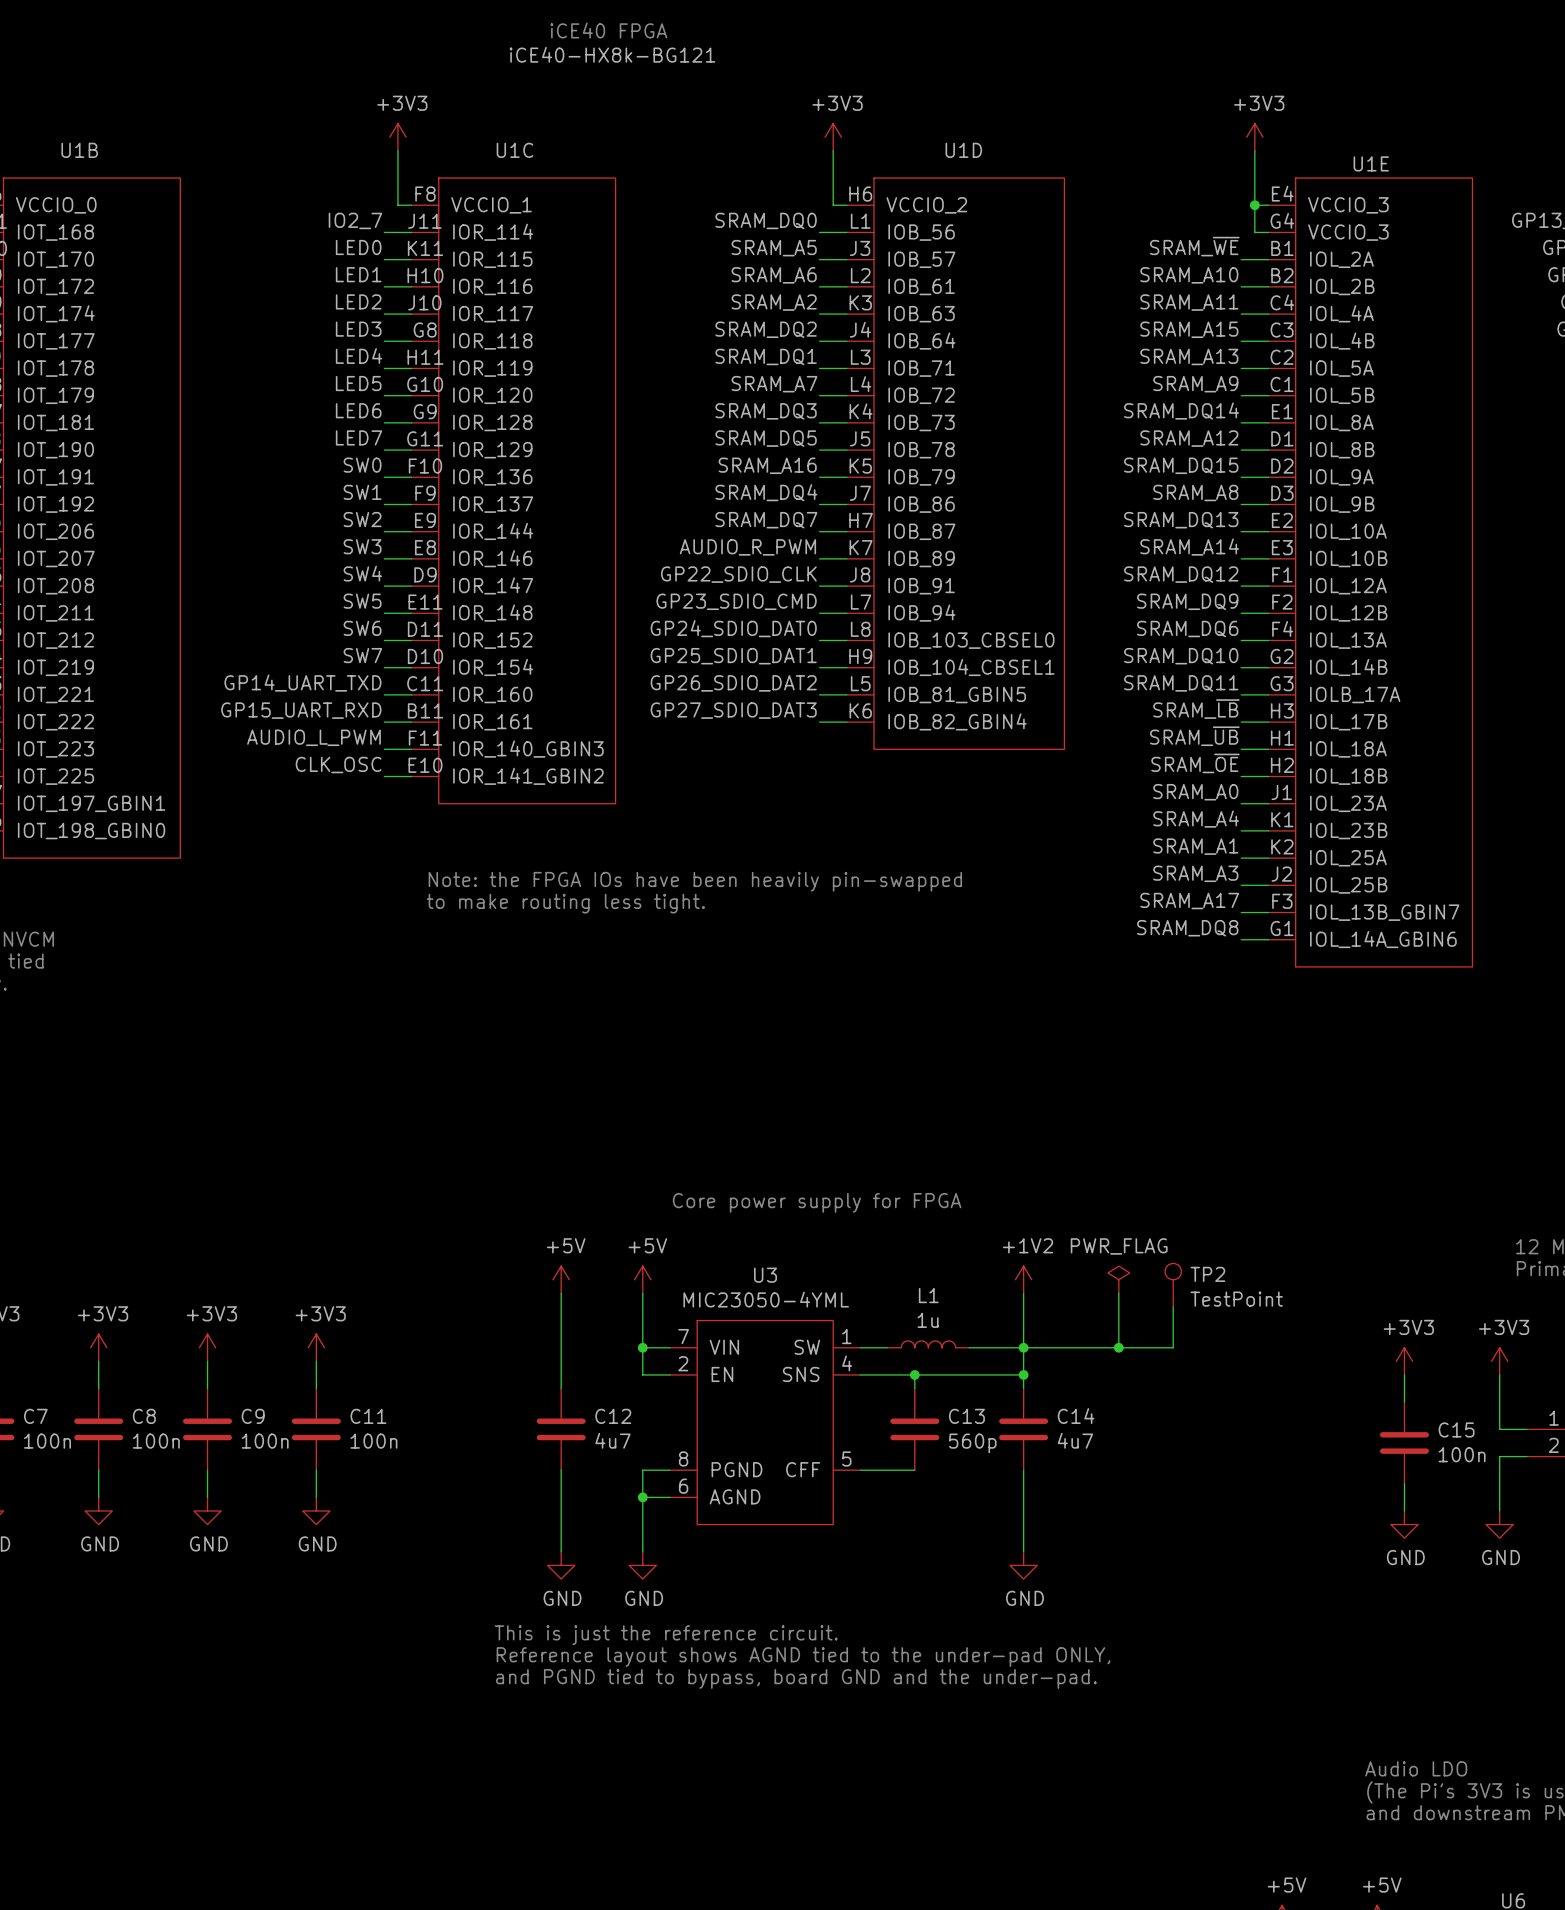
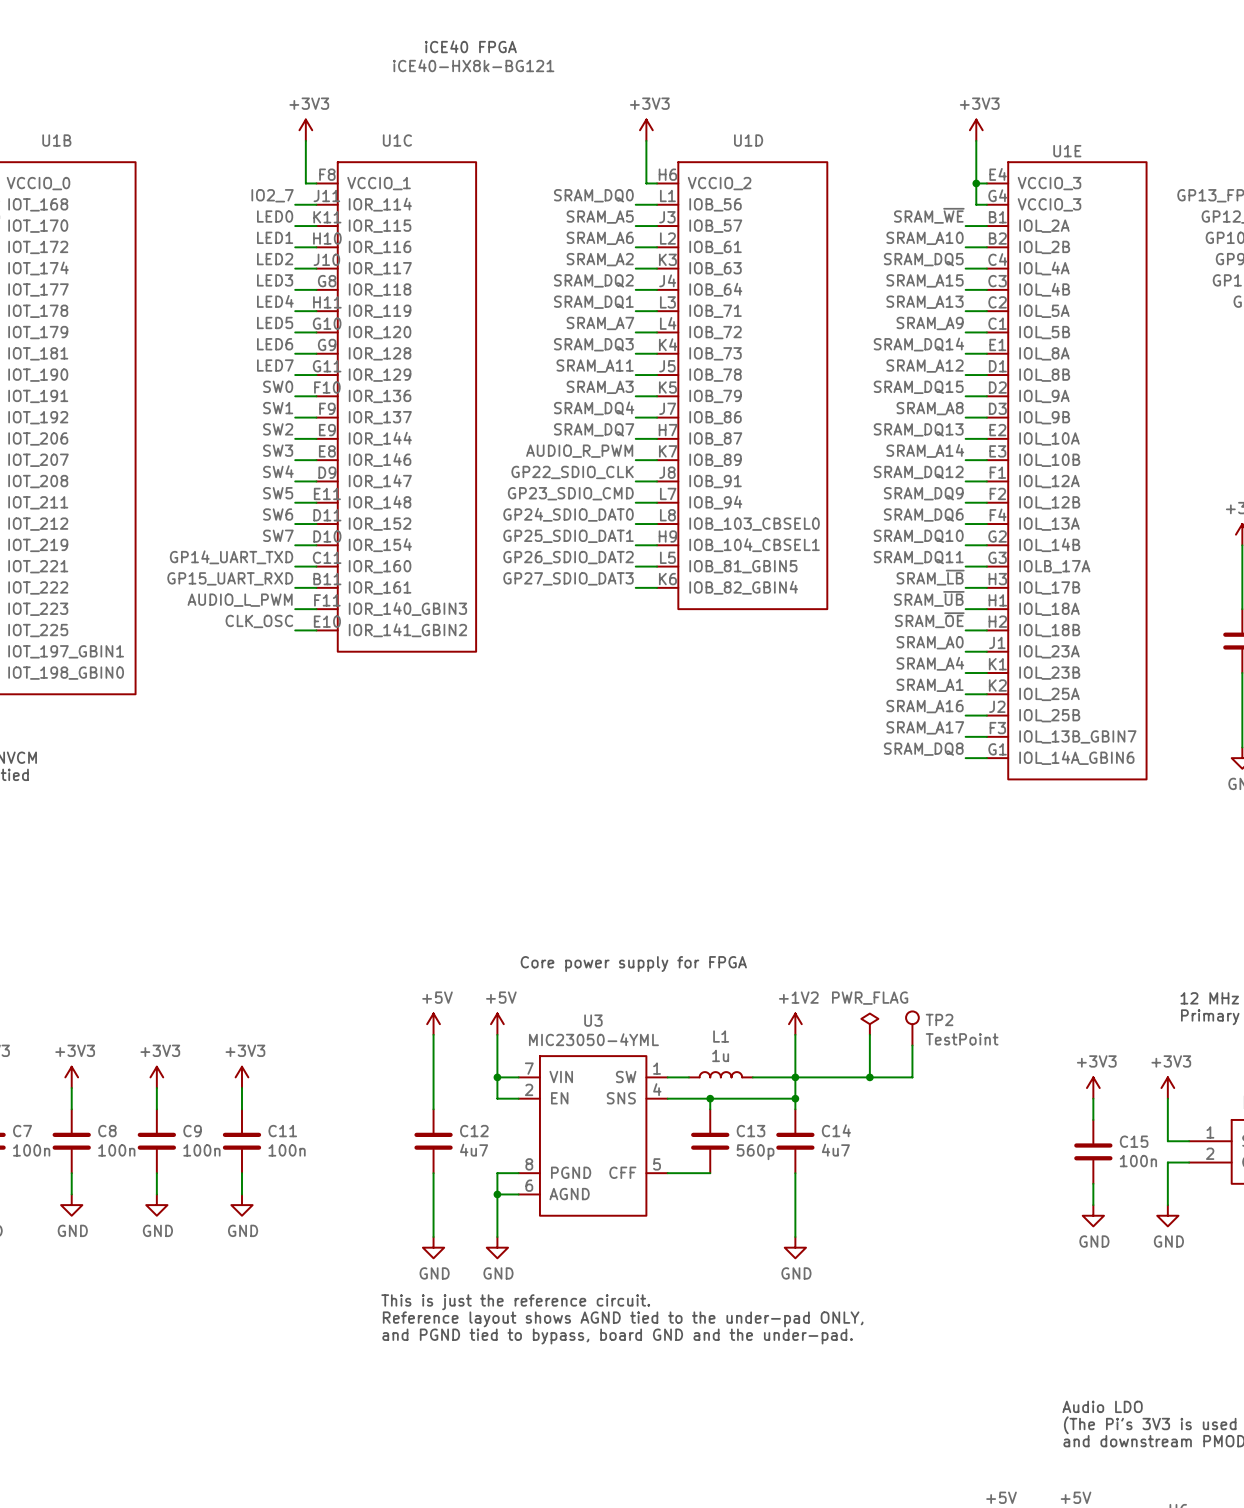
label: SRAM_A11 (1189, 302) -> SRAM_DQ5 (923, 259)
label: SRAM_DQ5 (766, 438) -> SRAM_A11 (595, 366)
label: SRAM_A16 (767, 465) -> SRAM_A3 (600, 387)
label: SRAM_A3 (1195, 873) -> SRAM_A16 (925, 706)
text: Note: the FPGA IOs have been heavily pin-swapped (695, 881) -> none
text: to make routing less tight. (565, 903) -> none

